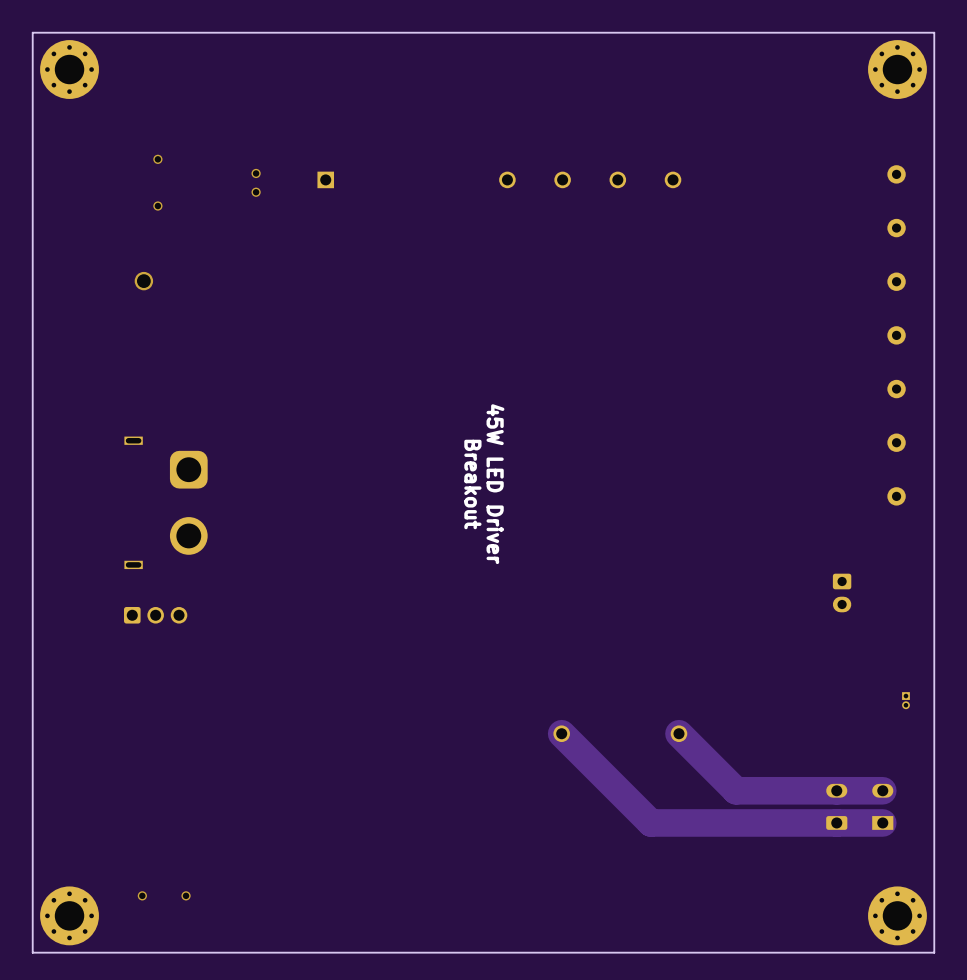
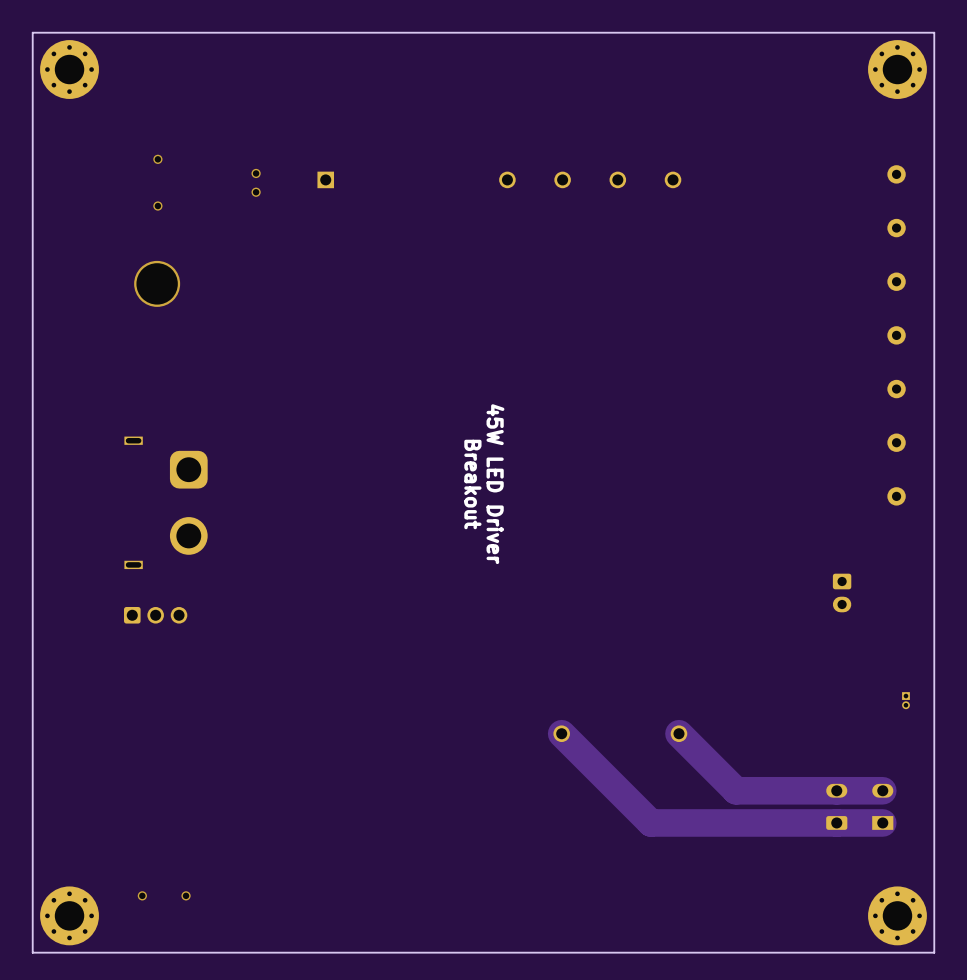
via: (143, 281) -> none
via: none -> (157, 283)

